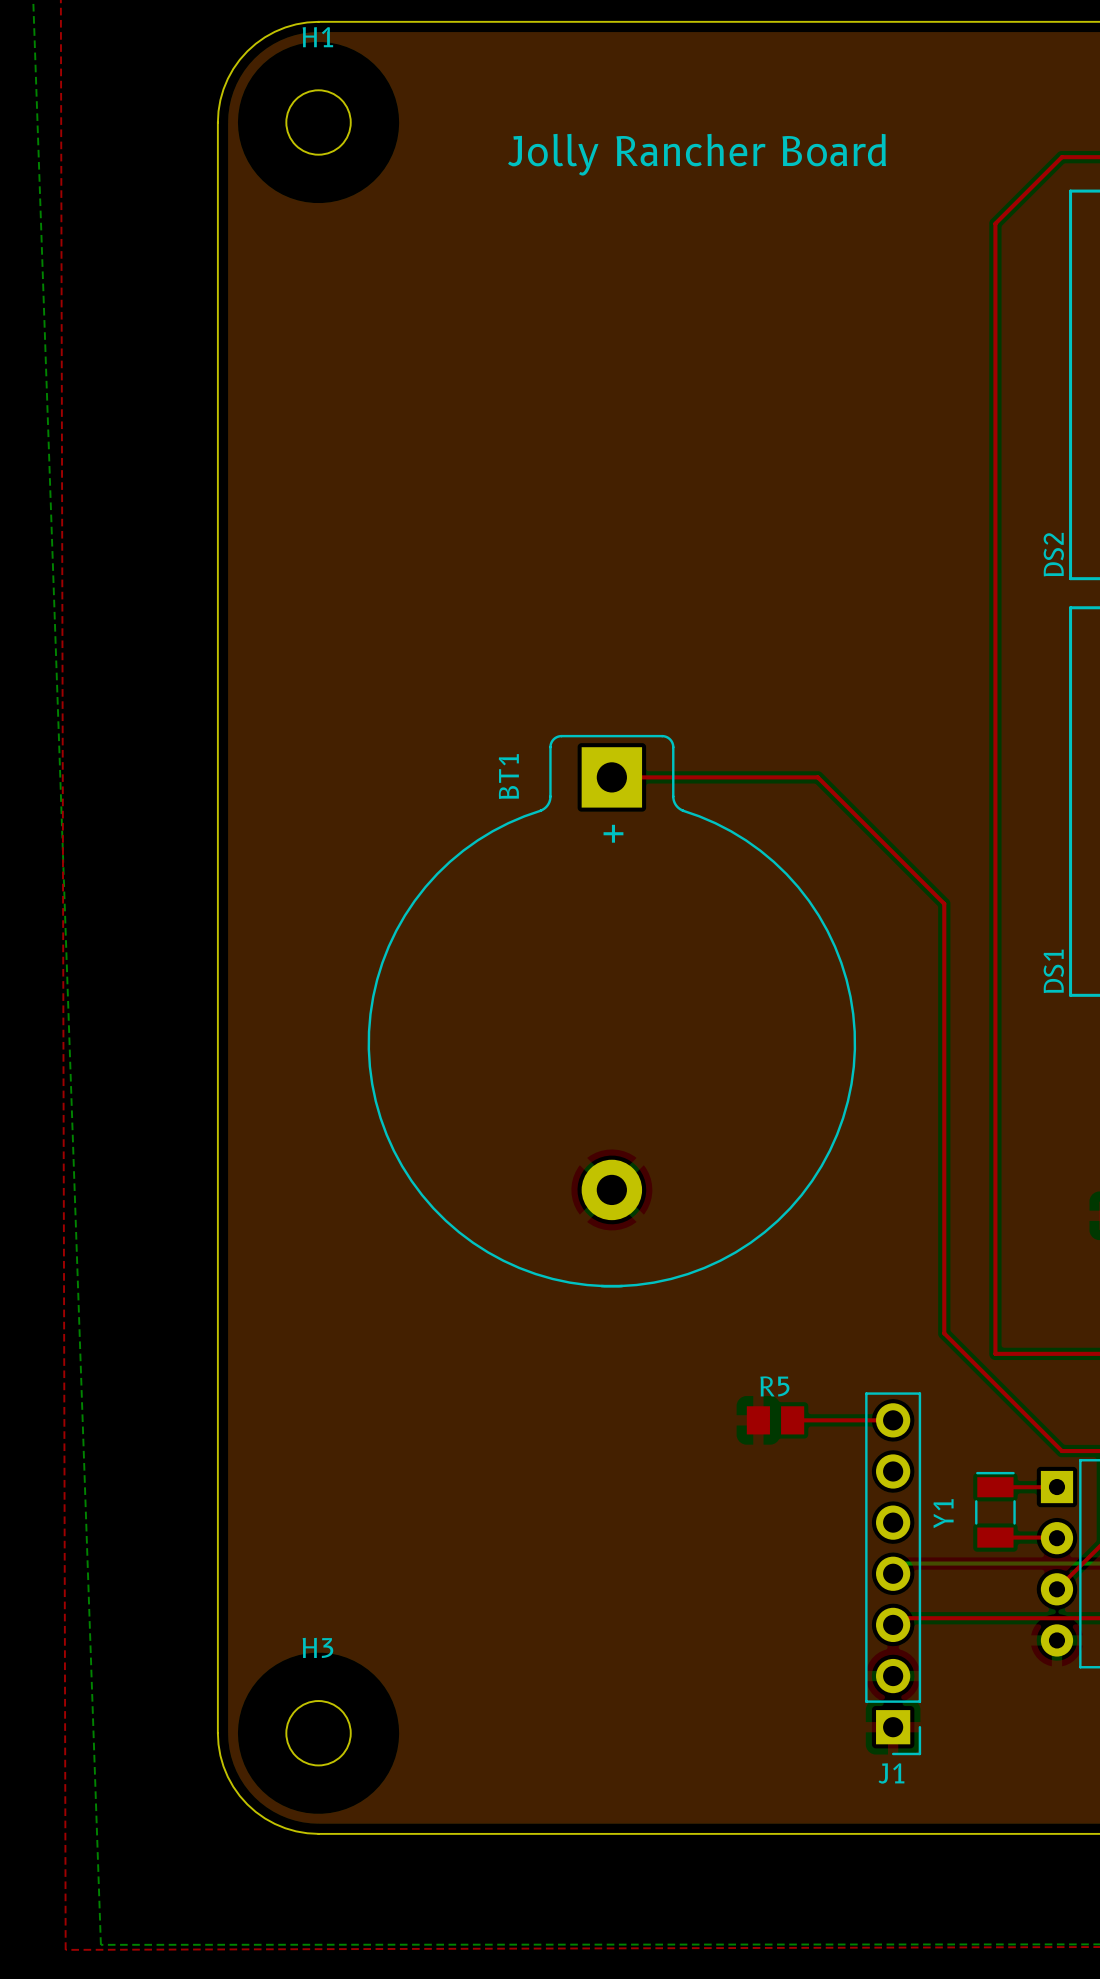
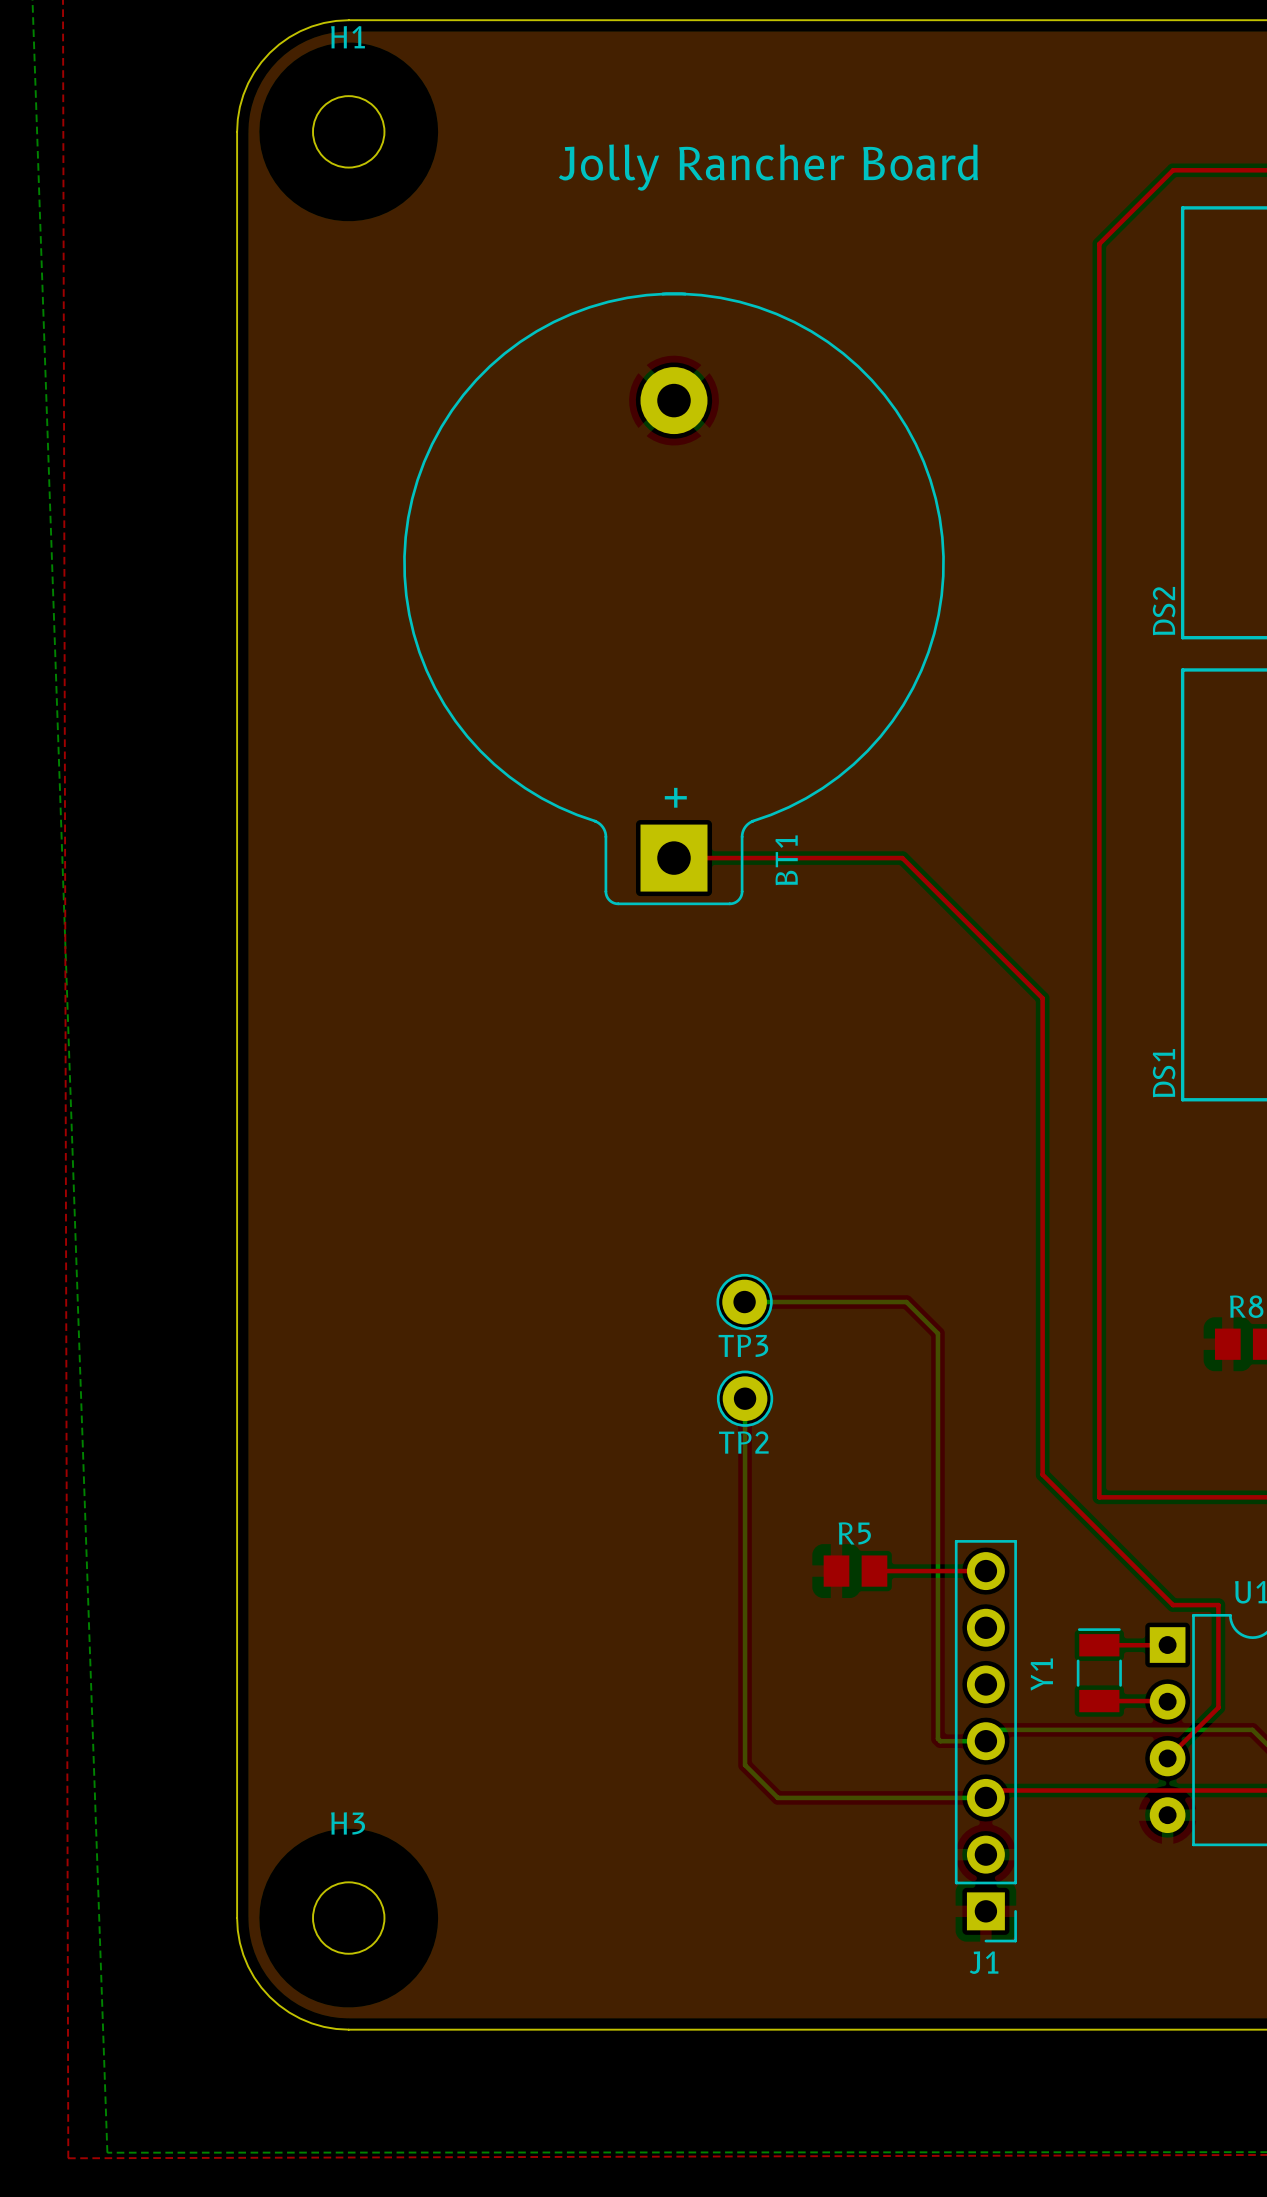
BT1 rotation: 0° (611, 1011) -> 180° (674, 598)
BT1 position: (611, 1011) -> (674, 598)
bottom track: none -> (744, 1302) (906, 1302) (937, 1333) (937, 1738) (940, 1741) (985, 1741)
TP3: none -> (744, 1302)
bottom track: none -> (745, 1398) (745, 1765) (777, 1797) (985, 1797)
TP2: none -> (745, 1398)

